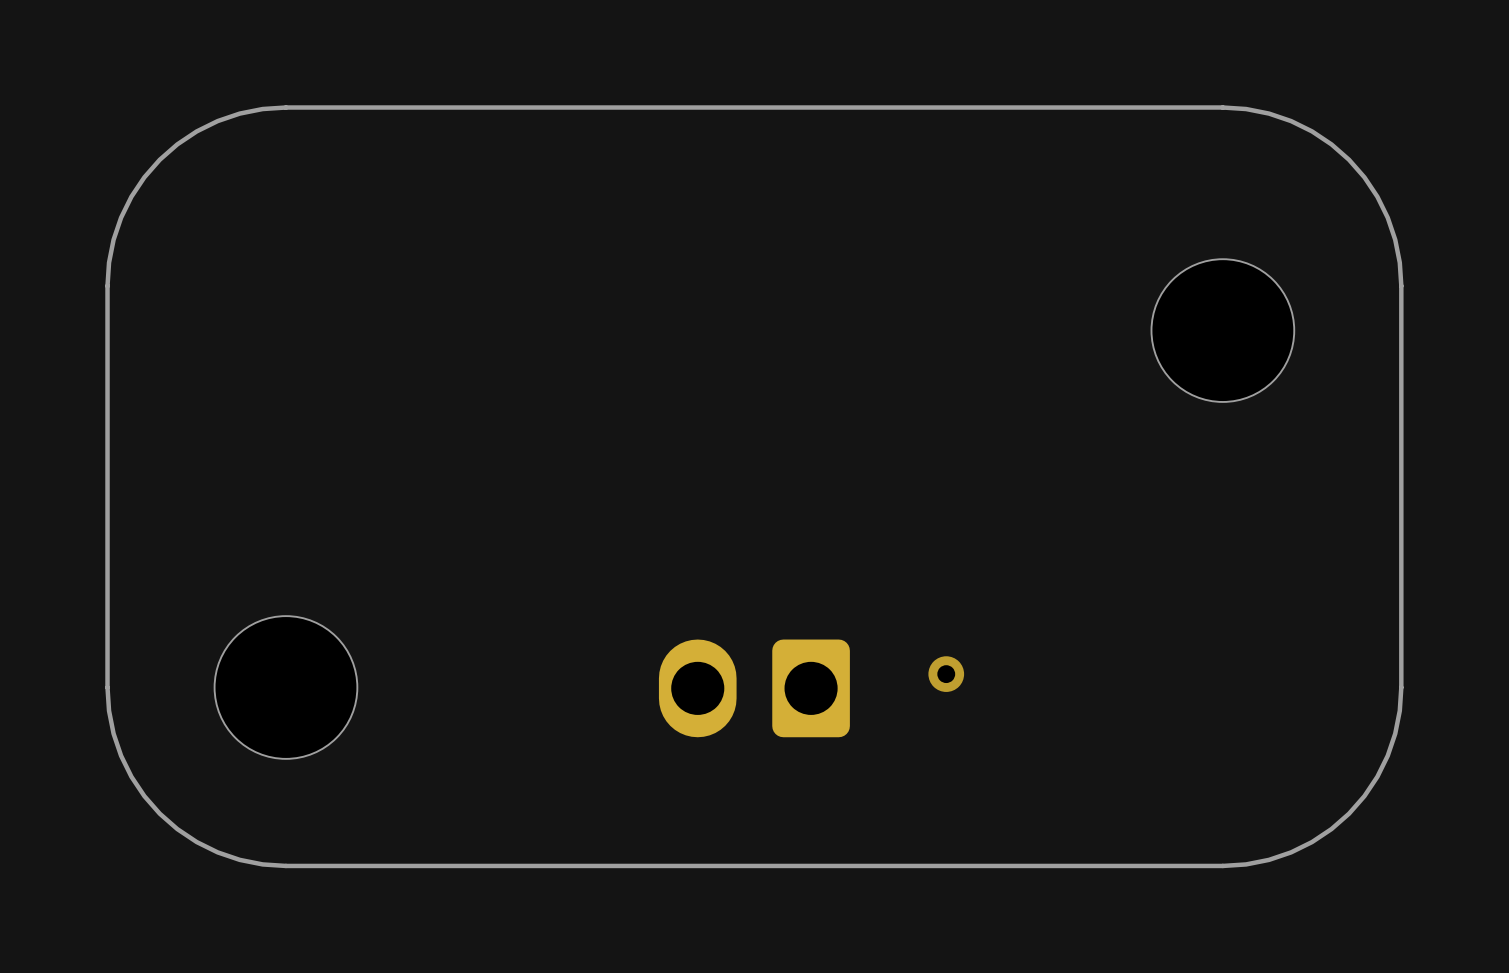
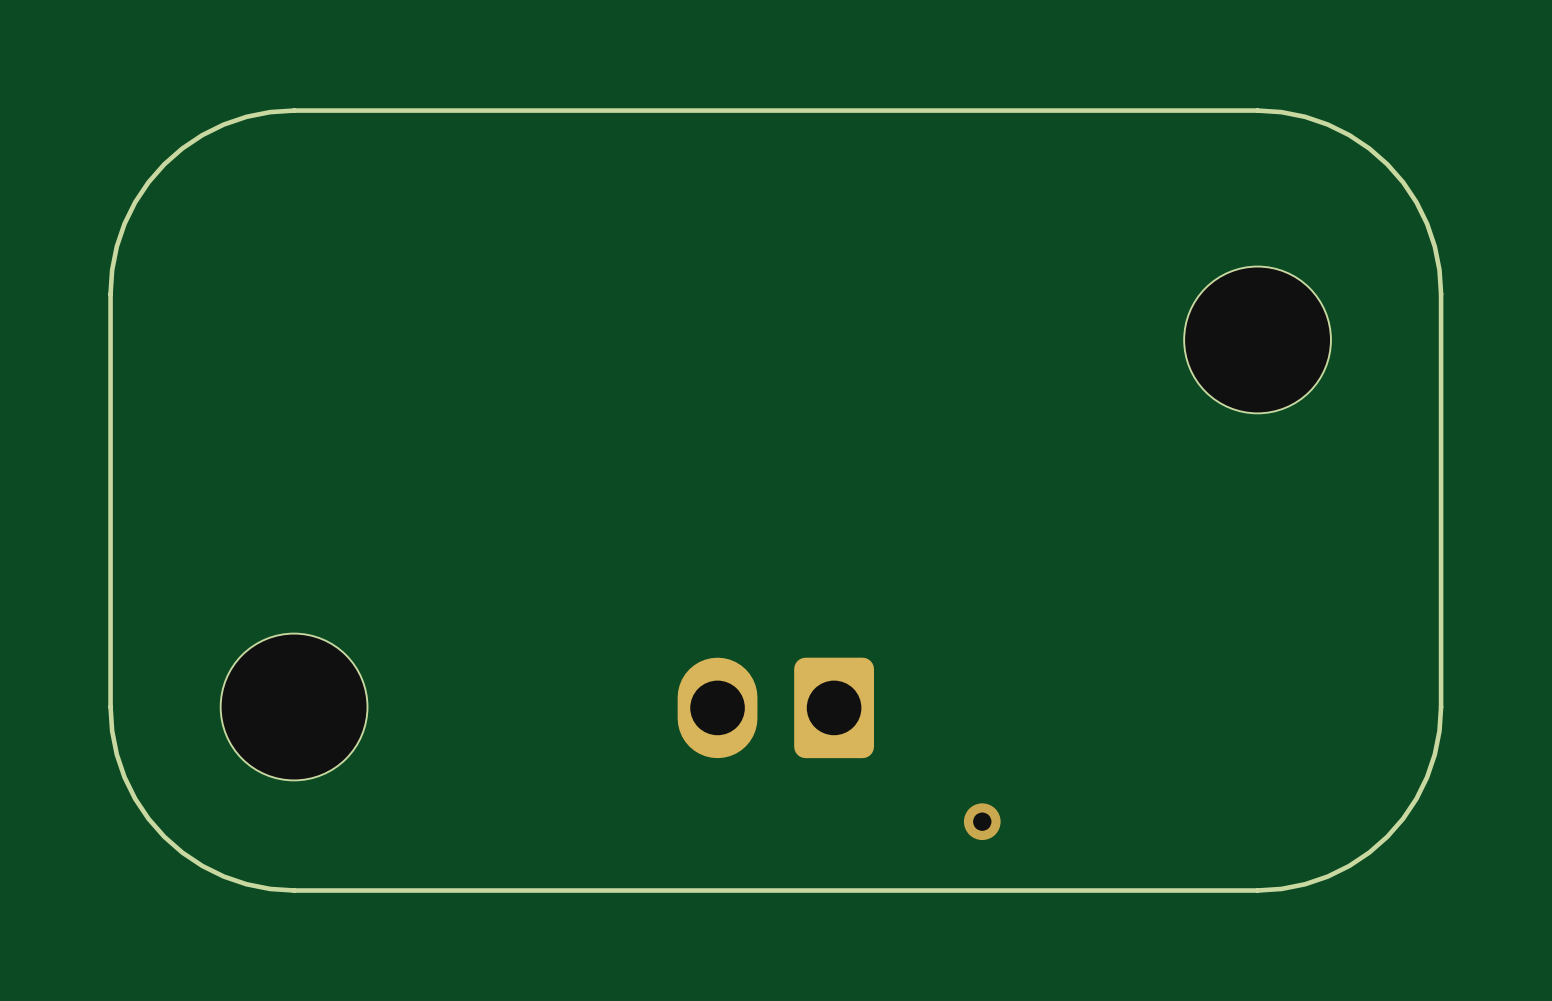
via position: (946, 674) -> (982, 821)

